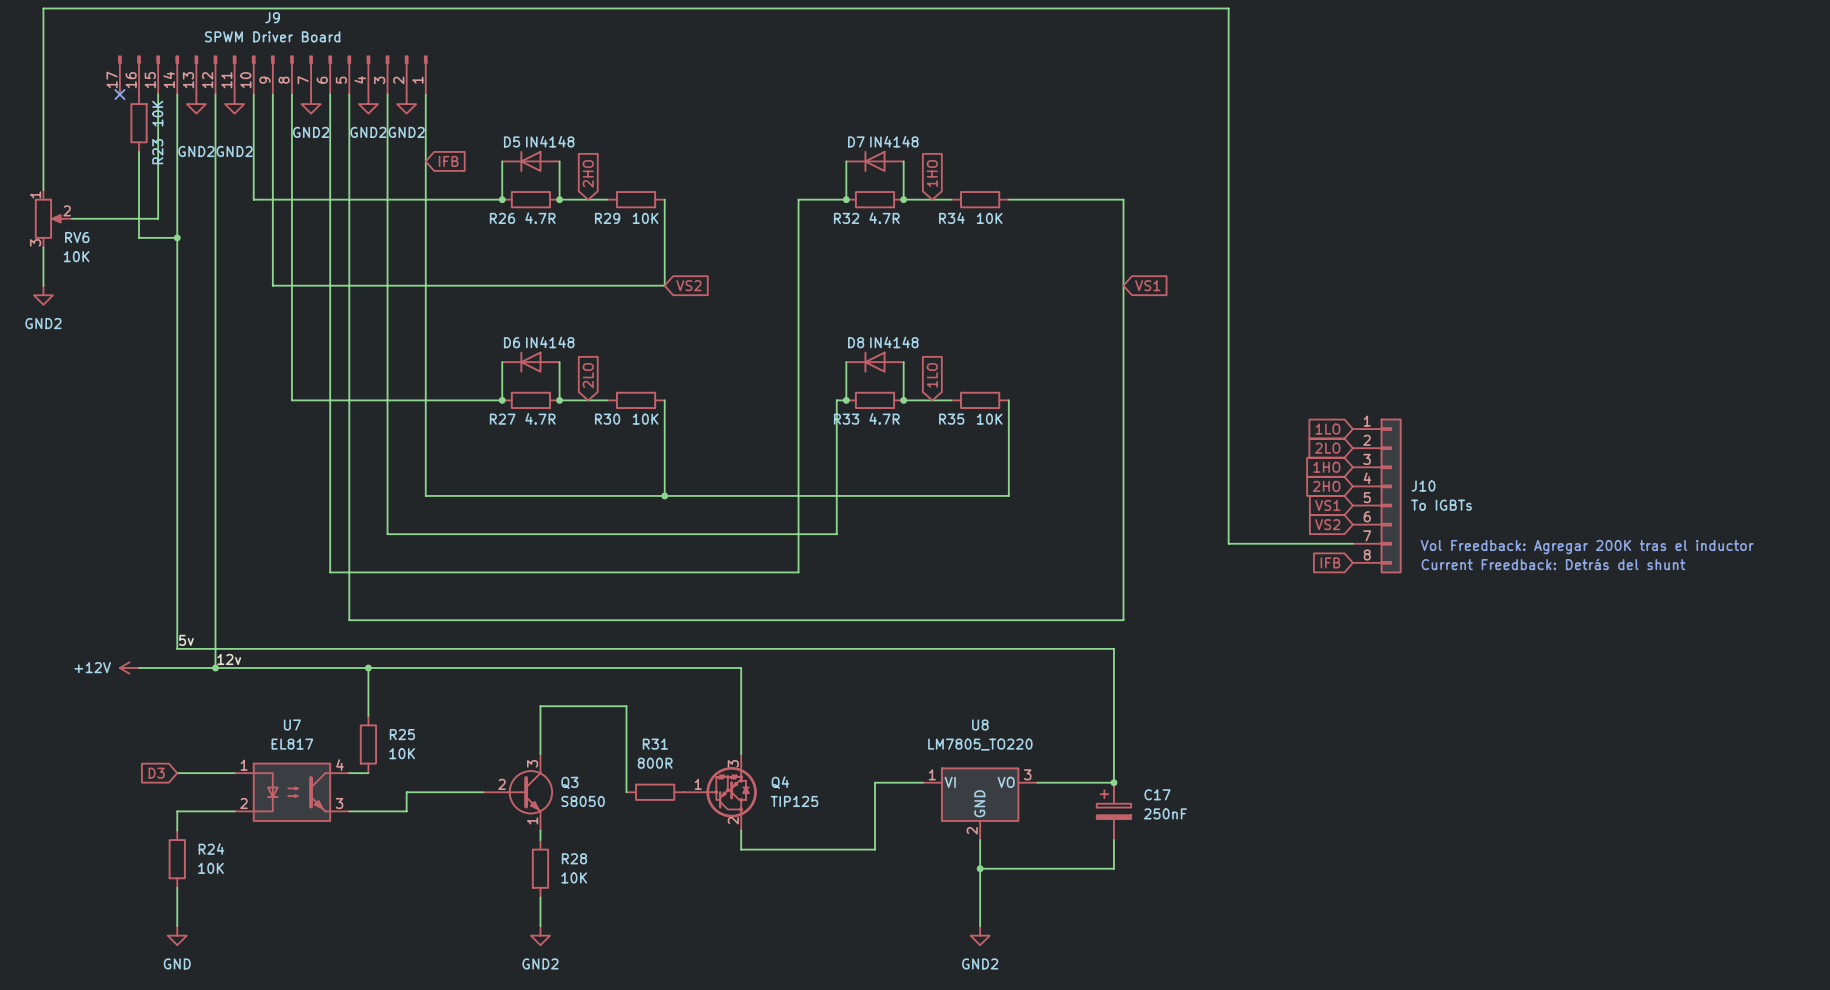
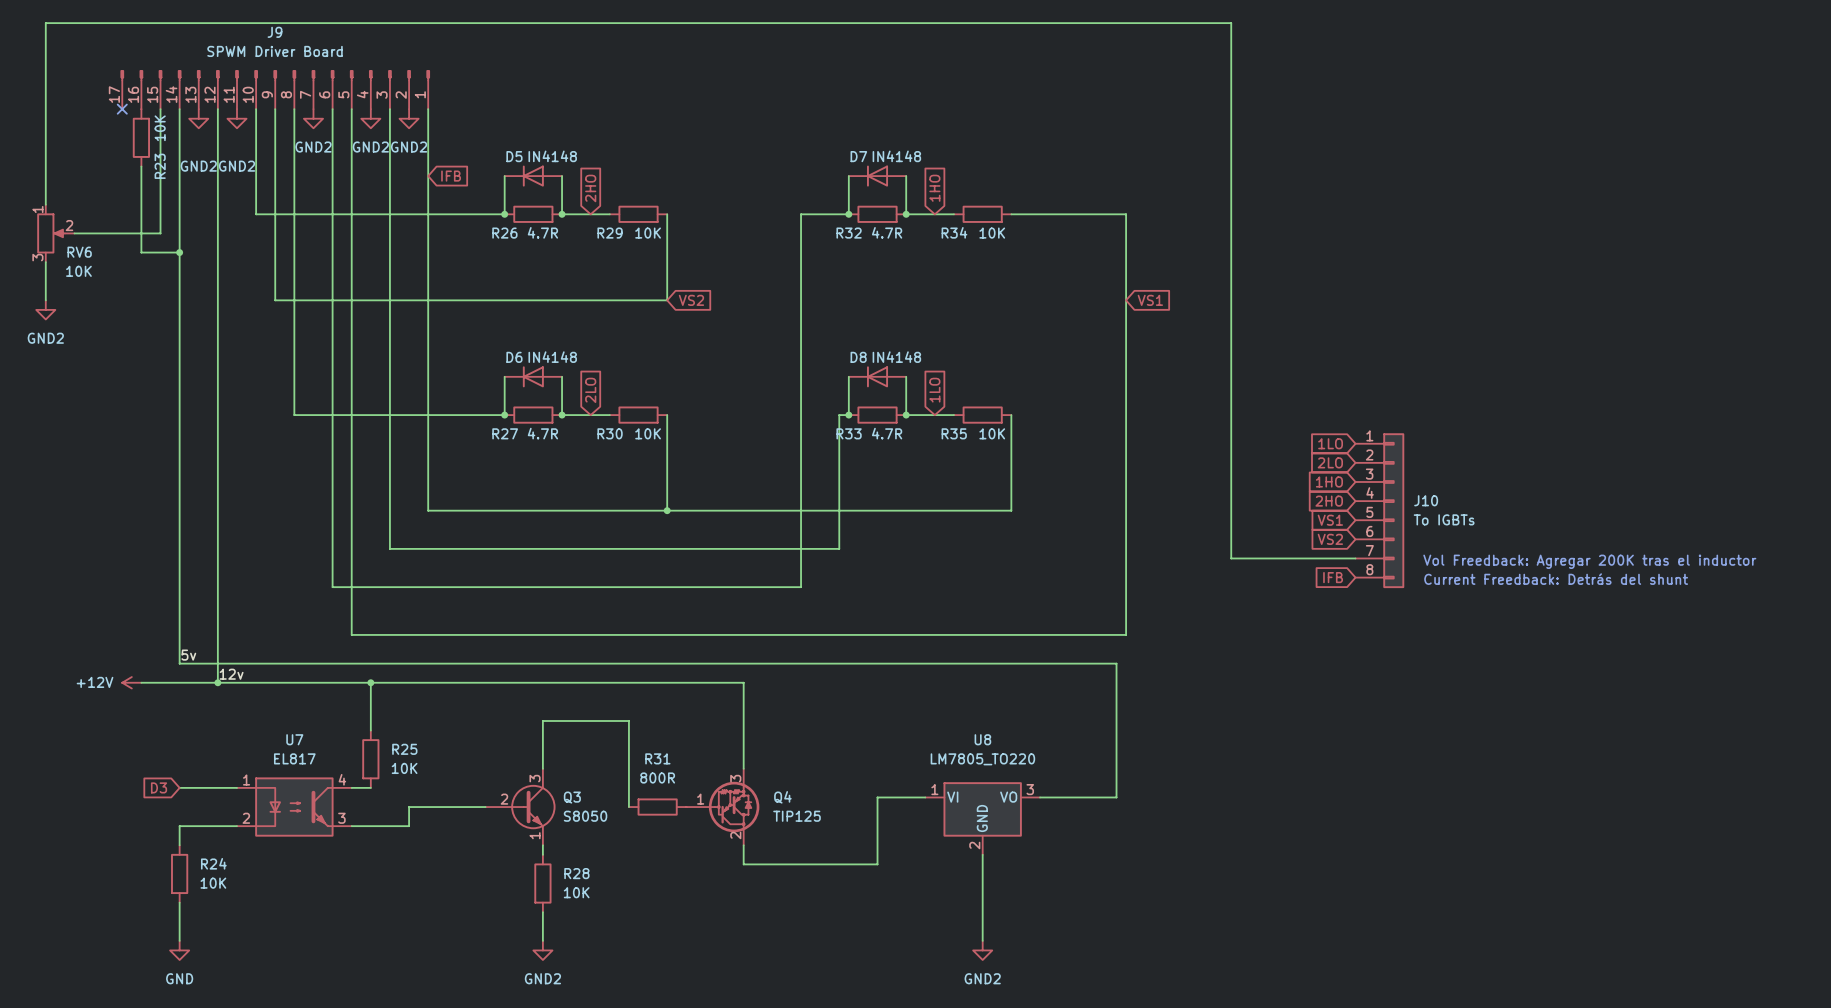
junction: (1113, 782) -> none
C17: 250nF (1113, 811) -> none
wire: (1113, 840) (1113, 868) (980, 868) -> none
junction: (980, 868) -> none

